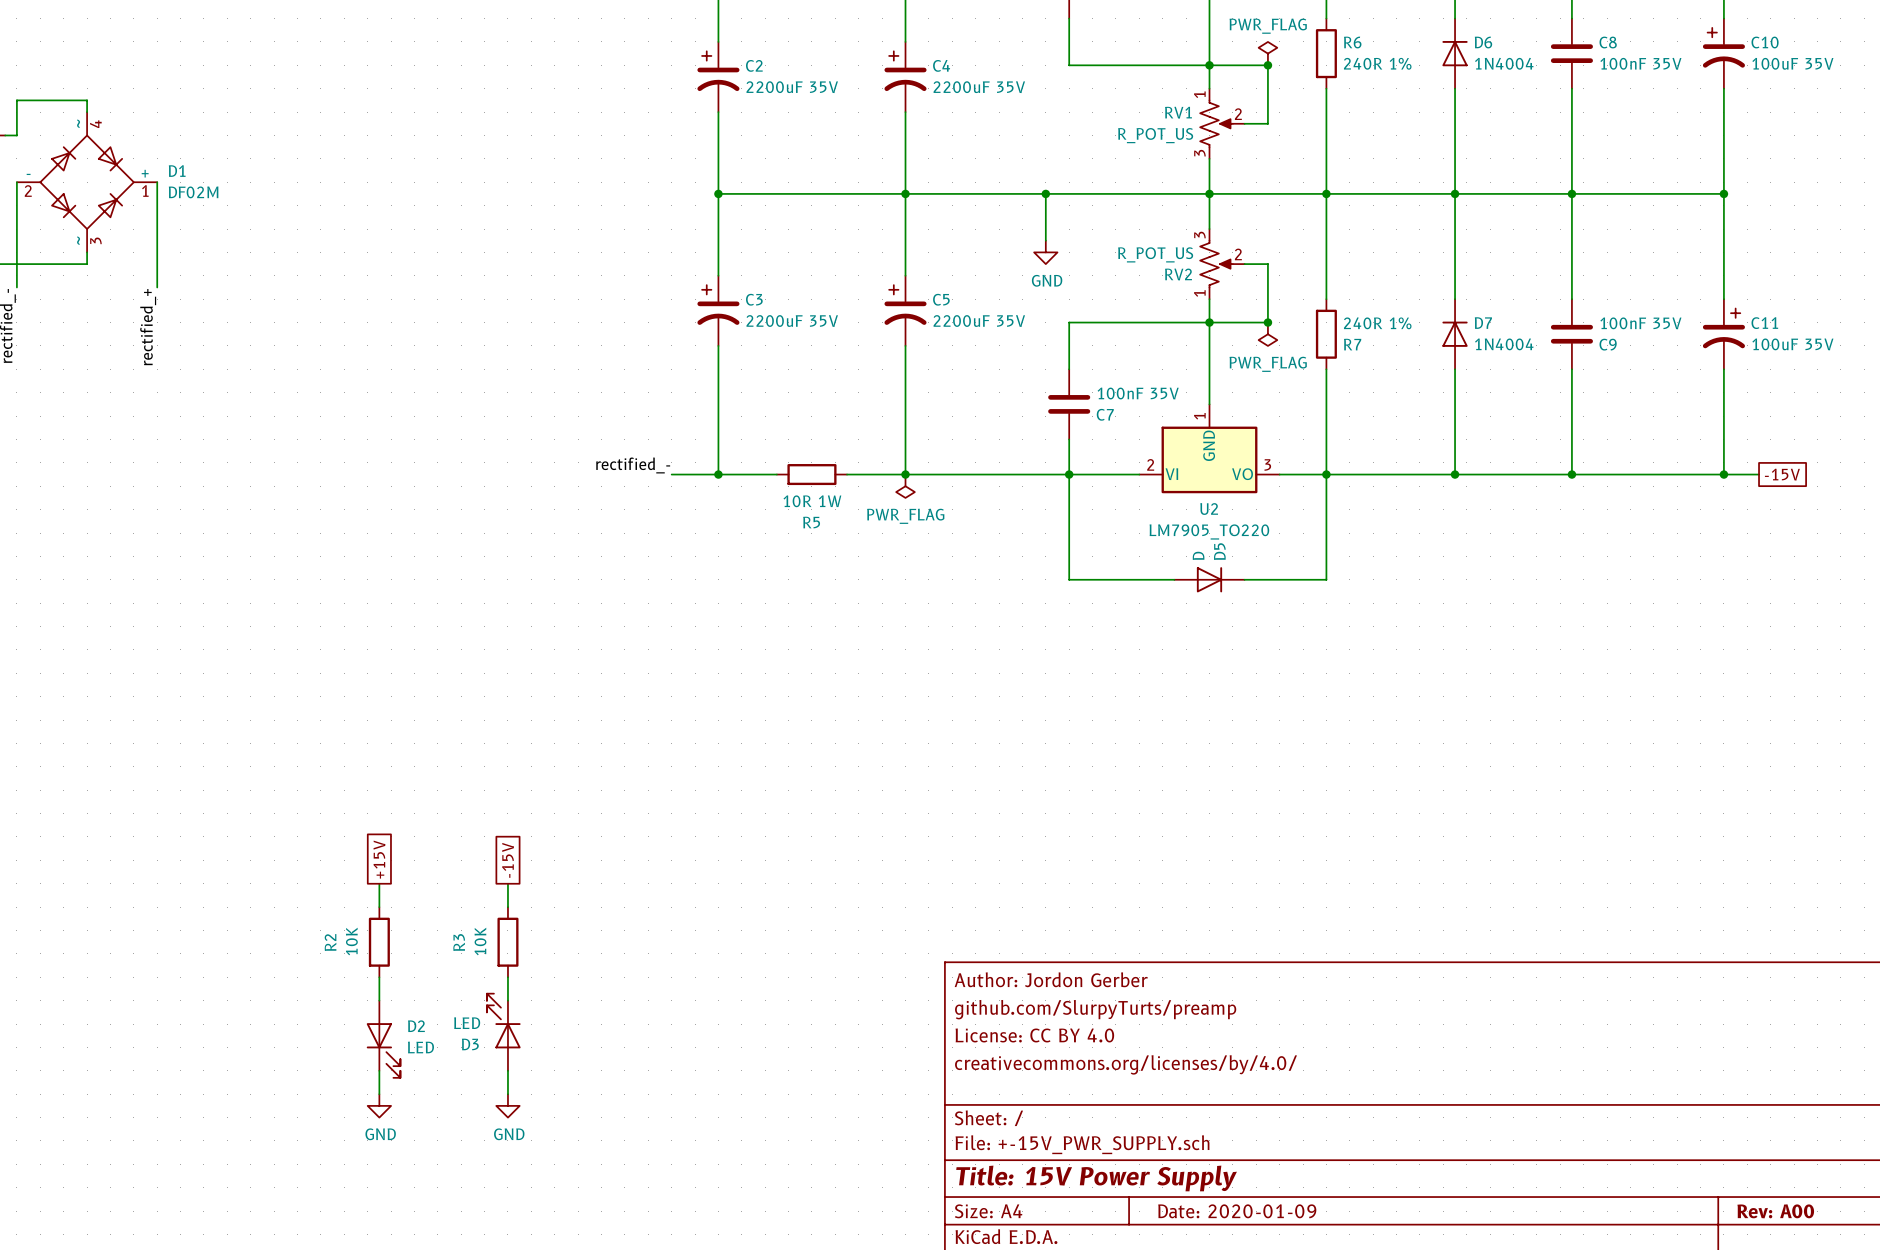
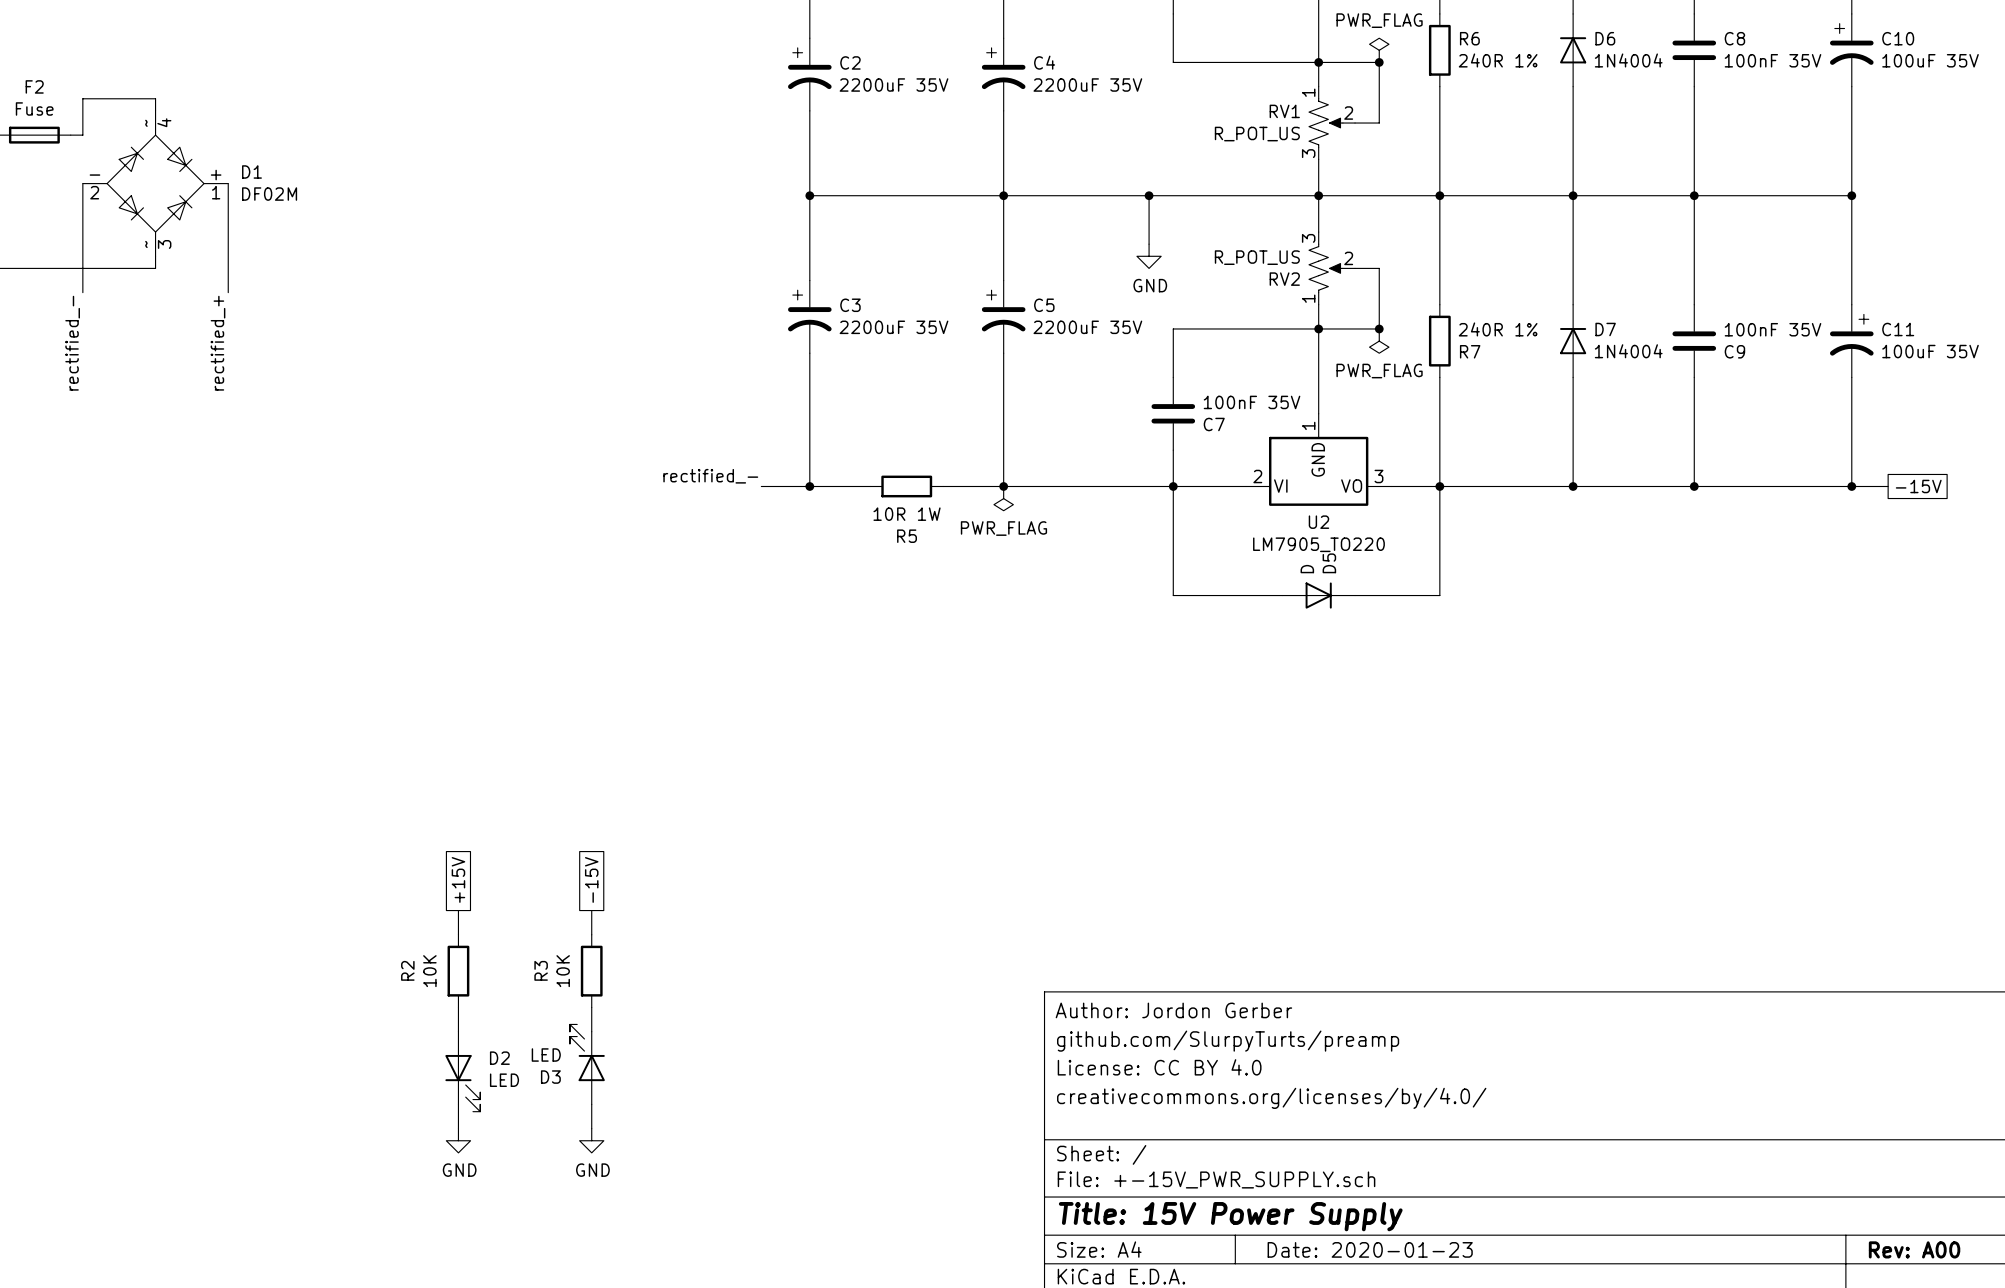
title block: Date: 2020-01-09 (1237, 1211) -> Date: 2020-01-23 (1370, 1249)

